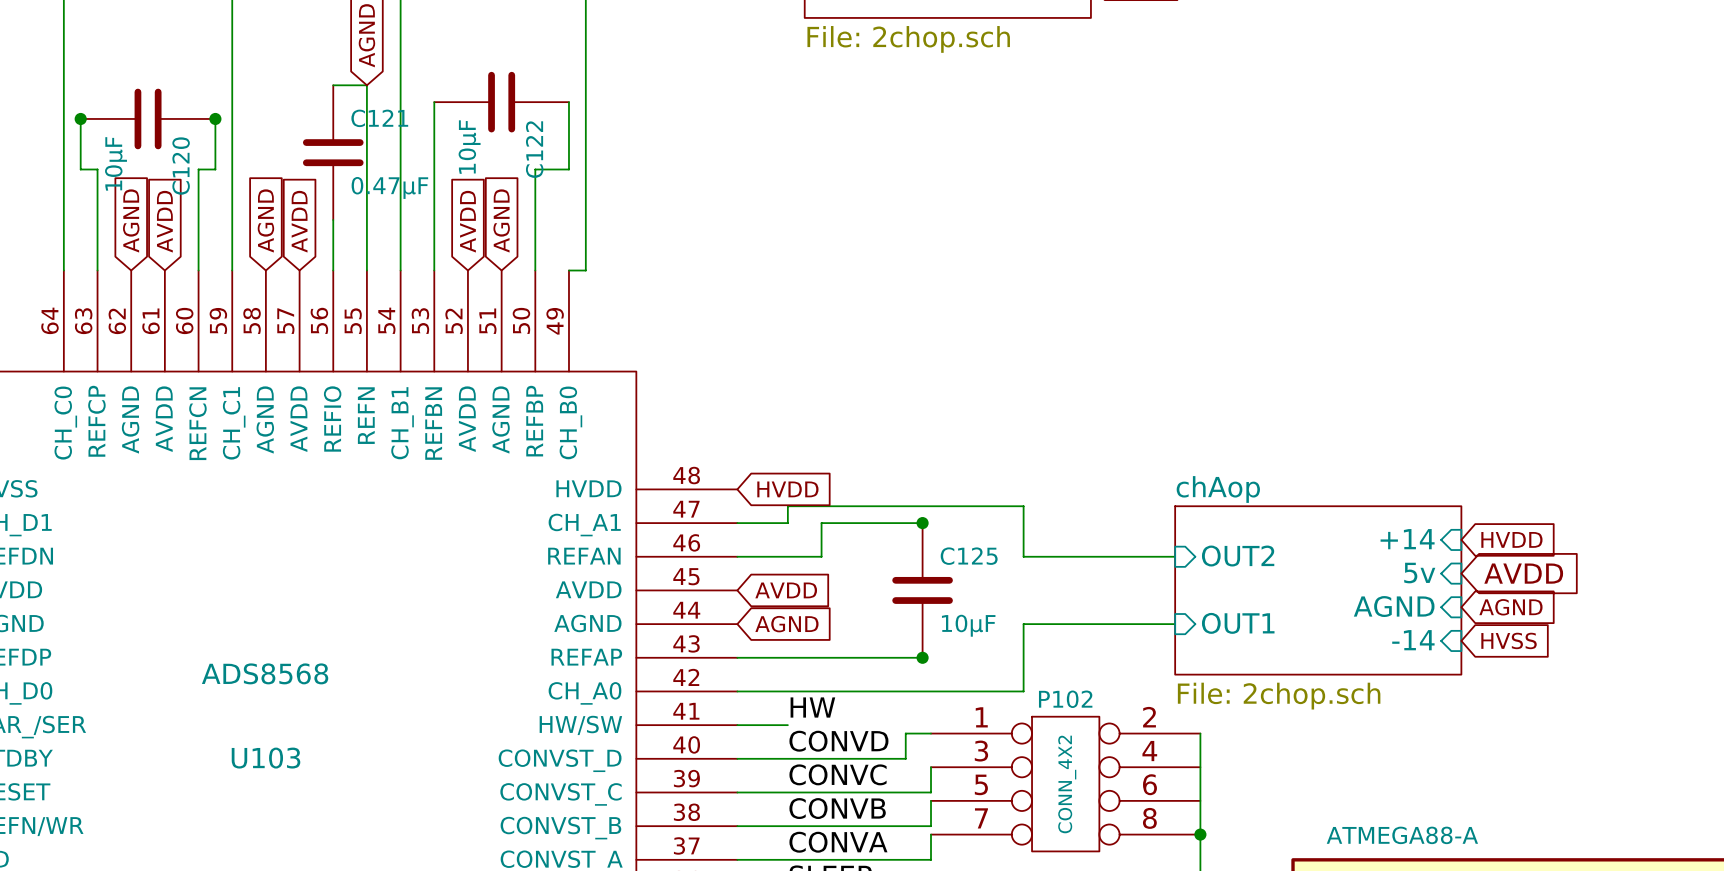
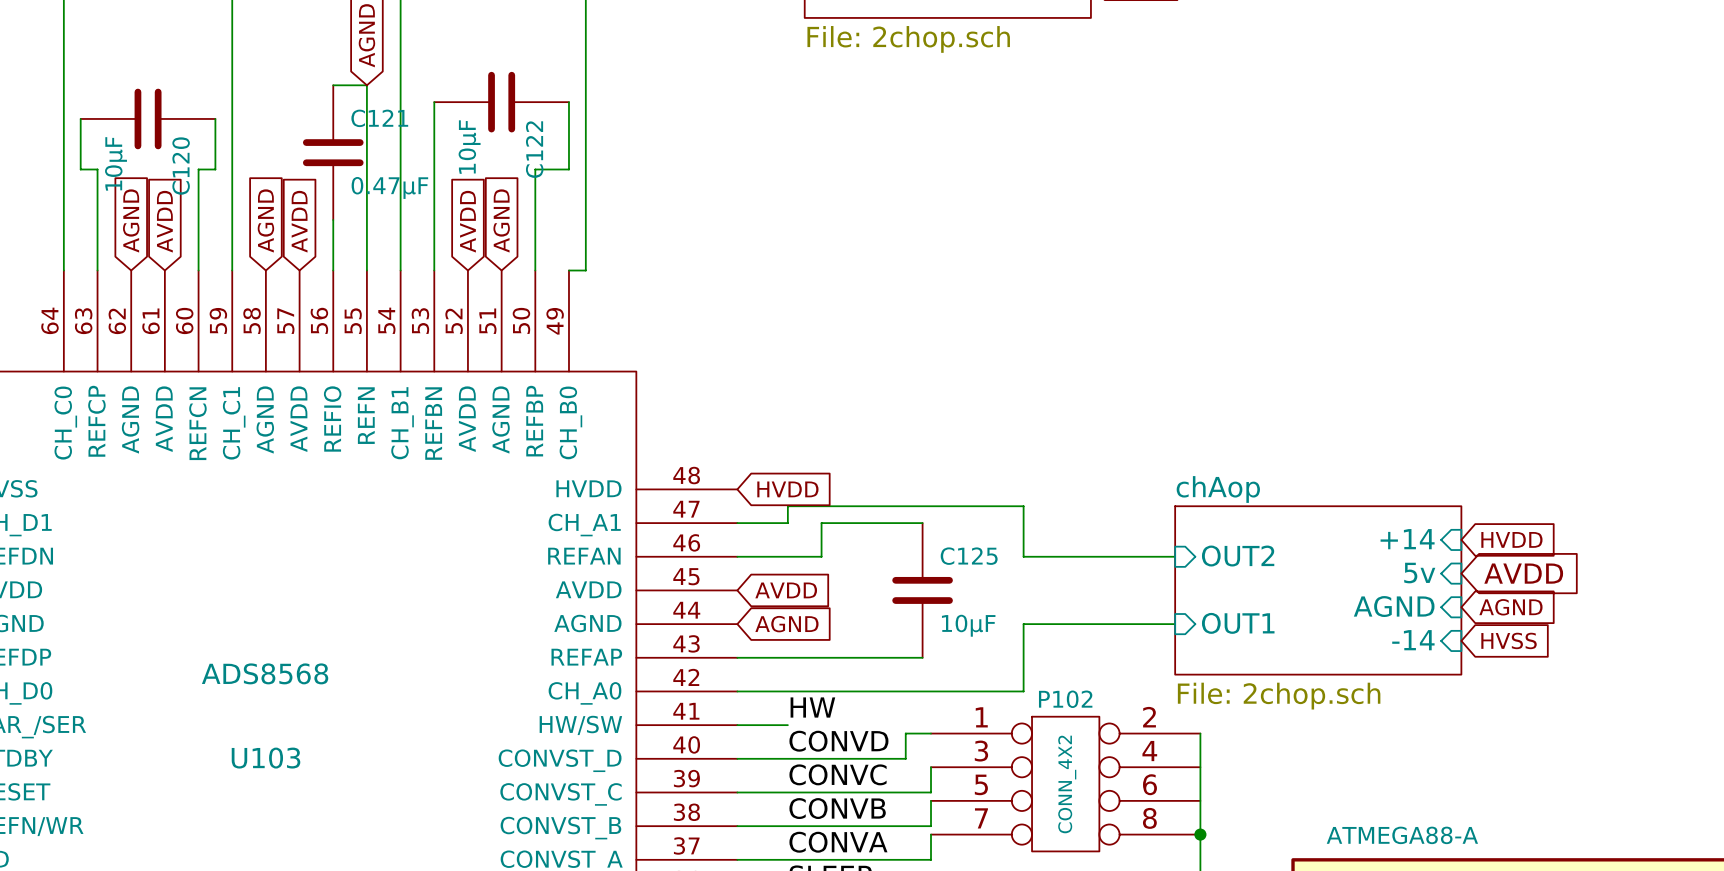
junction: (80, 118) -> none
junction: (215, 118) -> none
junction: (922, 523) -> none
junction: (922, 657) -> none

